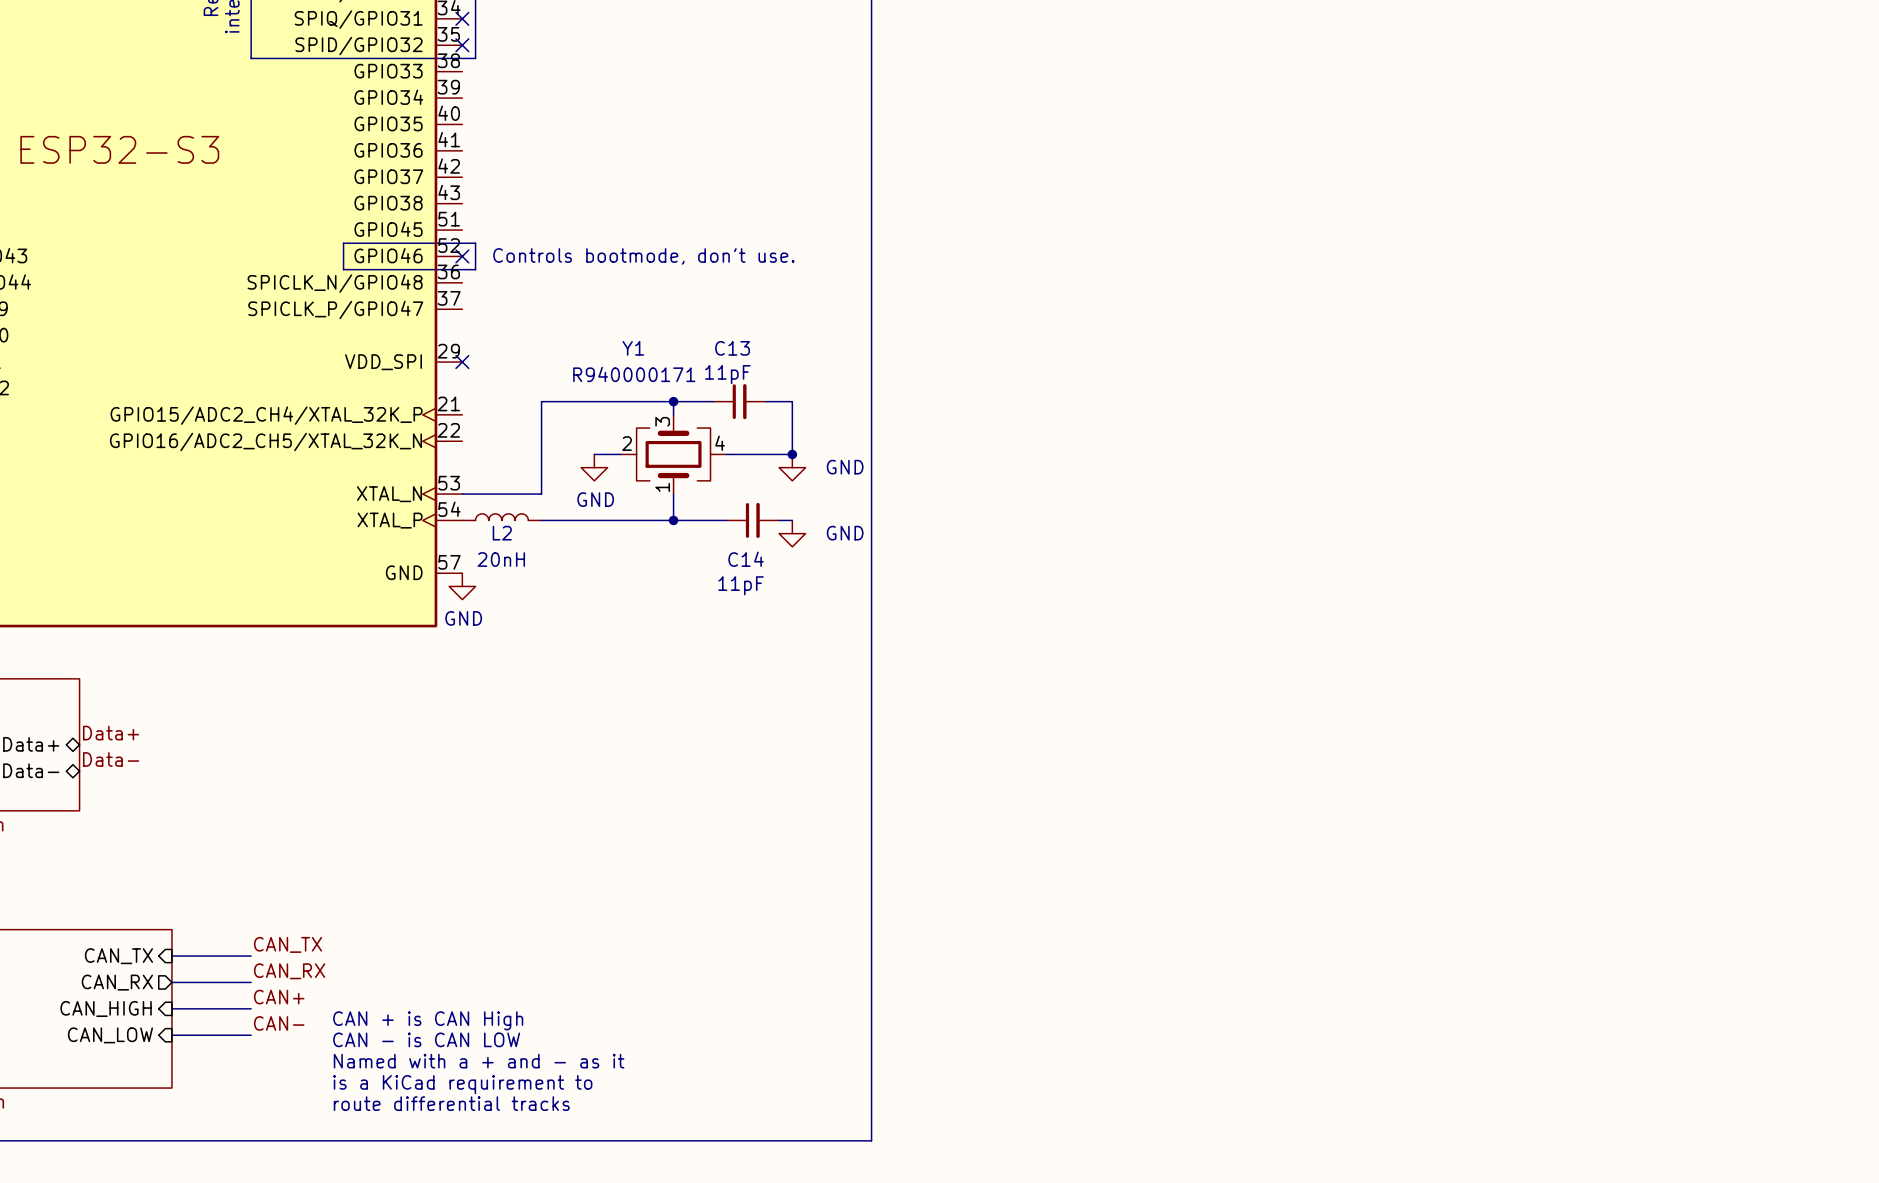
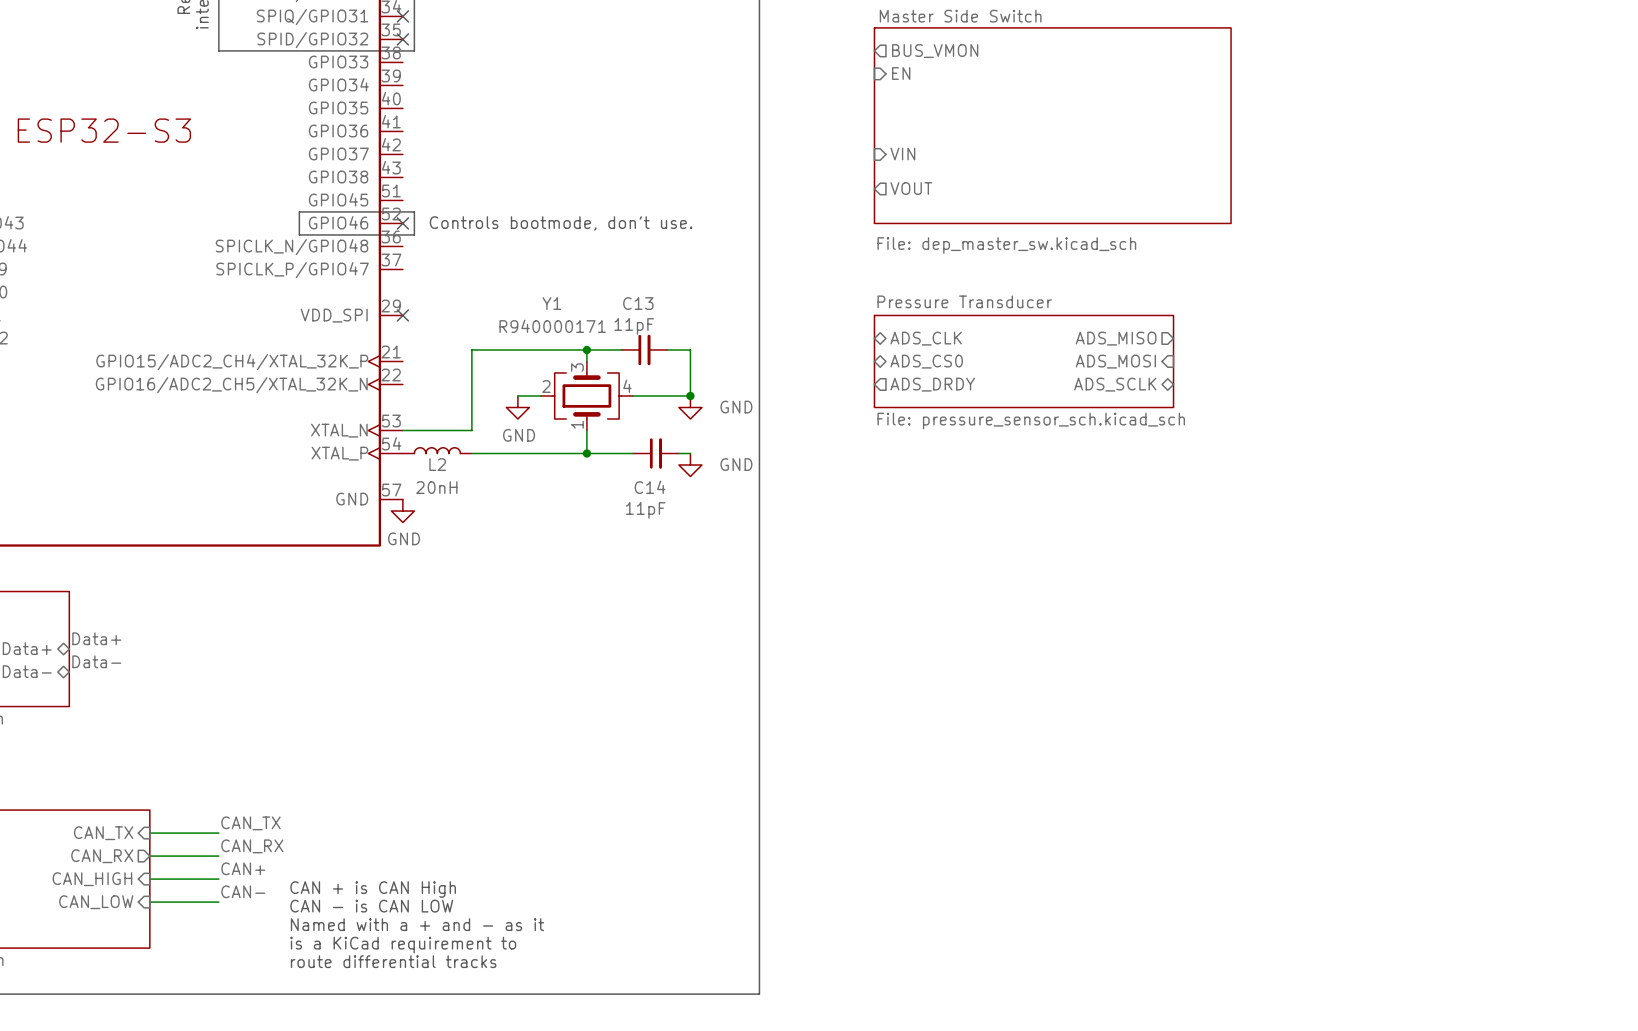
sheet pin: none -> BUS_VMON (935, 51)
sheet pin: none -> EN (901, 73)
sheet Master Side Switch: none -> File: dep_master_sw.kicad_sch (1052, 125)
sheet pin: none -> VIN (902, 154)
sheet pin: none -> VOUT (911, 188)
sheet pin: none -> ADS_CLK (926, 338)
sheet pin: none -> ADS_MISO (1116, 338)
sheet pin: none -> ADS_CS0 (926, 361)
sheet Pressure Transducer: none -> File: pressure_sensor_sch.kicad_sch (1023, 361)
sheet pin: none -> ADS_MOSI (1115, 361)
sheet pin: none -> ADS_DRDY (932, 384)
sheet pin: none -> ADS_SCLK (1115, 384)

